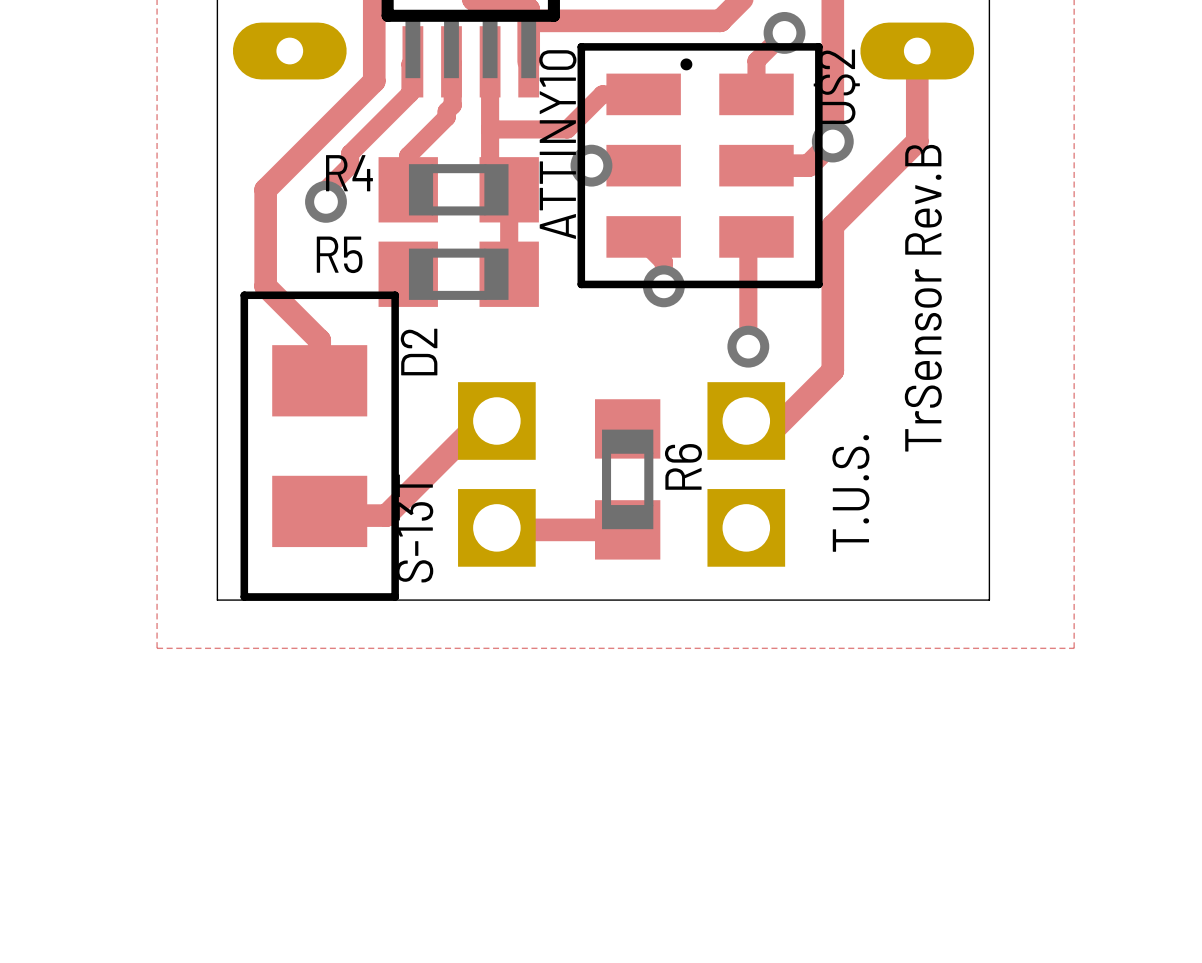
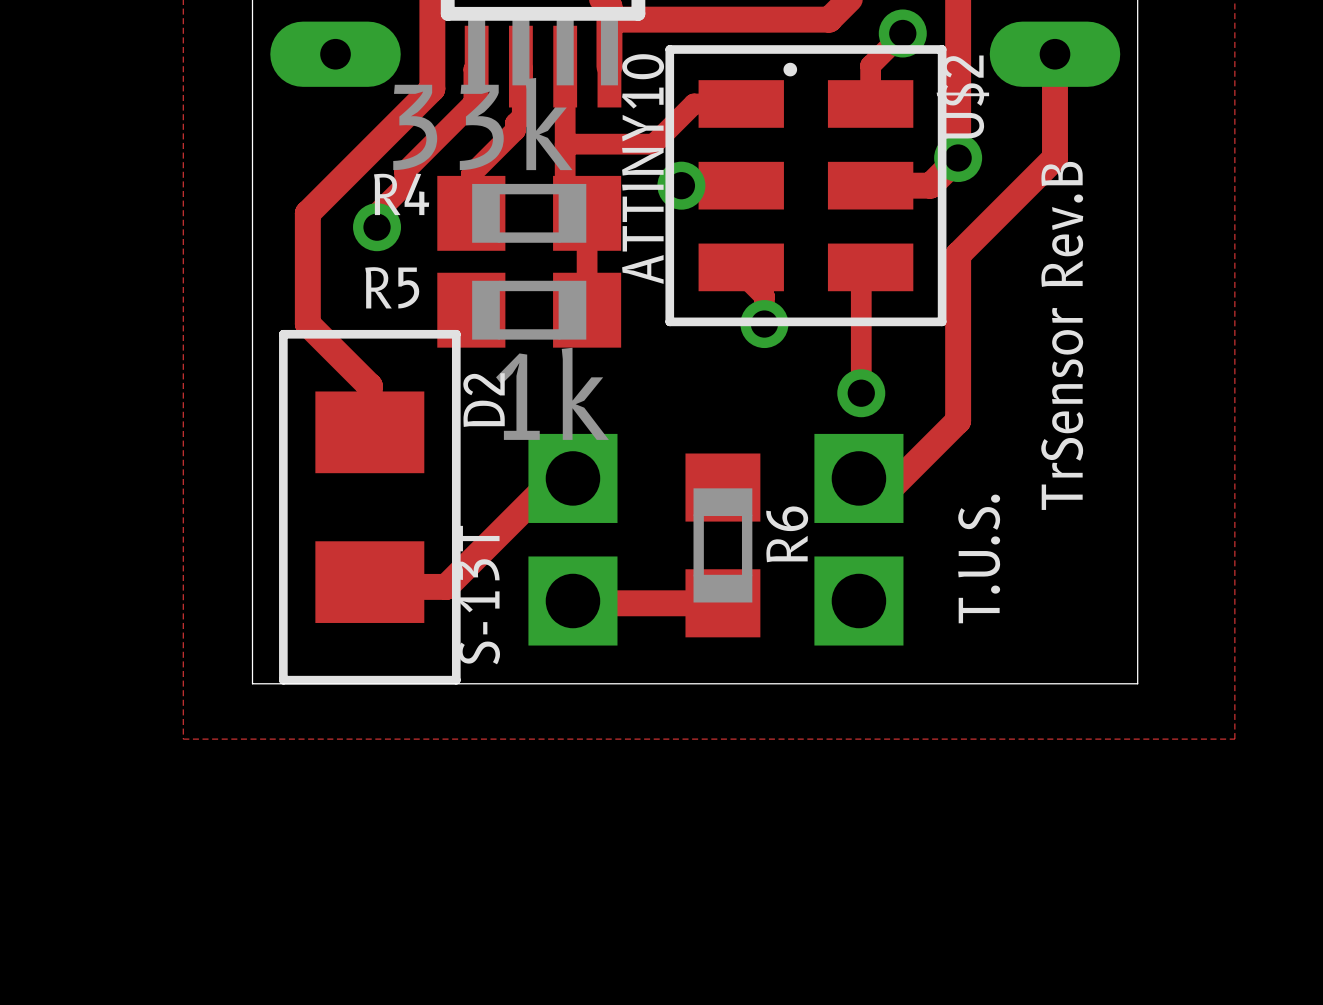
R4 value: none -> 33k (482, 124)
R5 value: none -> 1k (552, 393)

